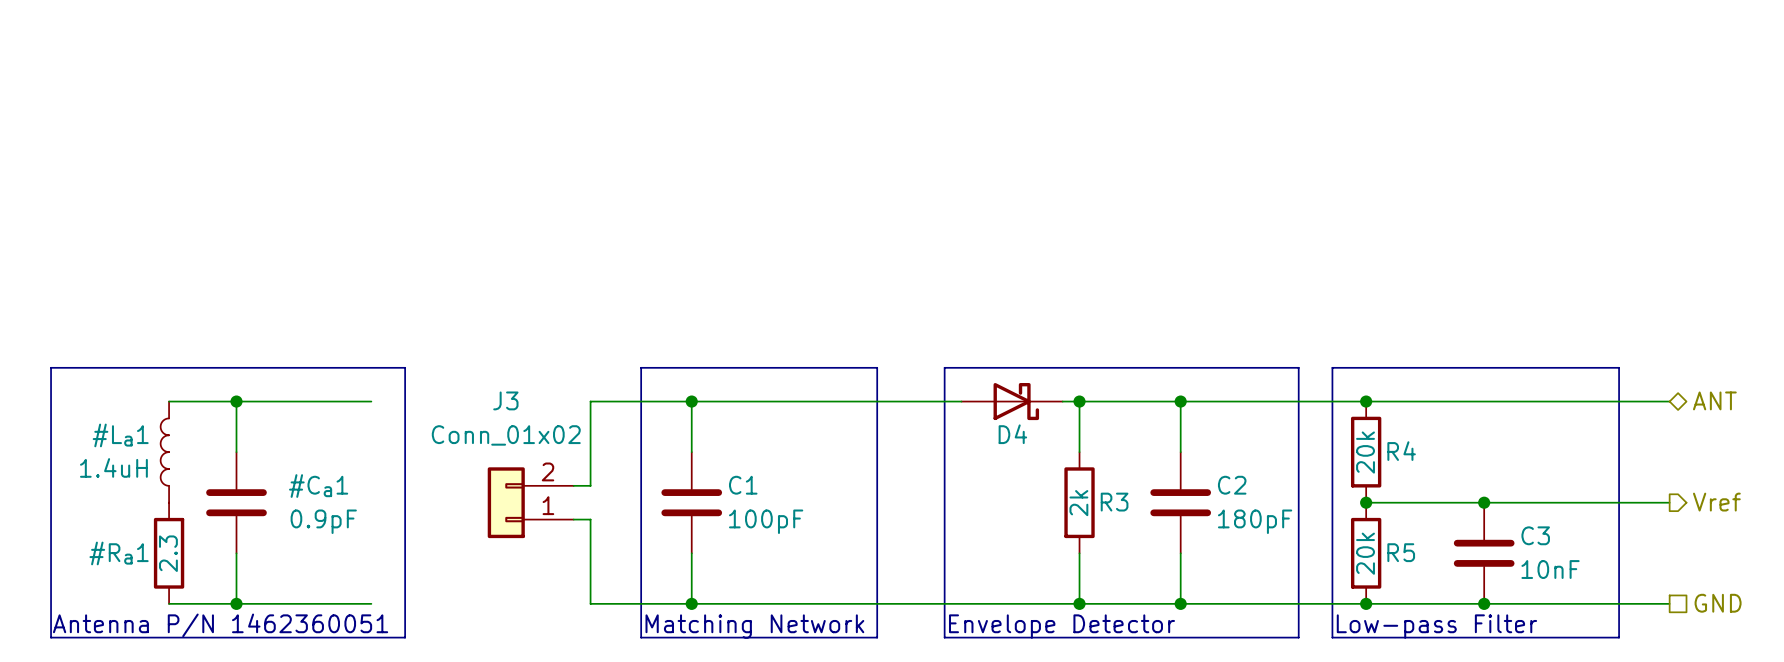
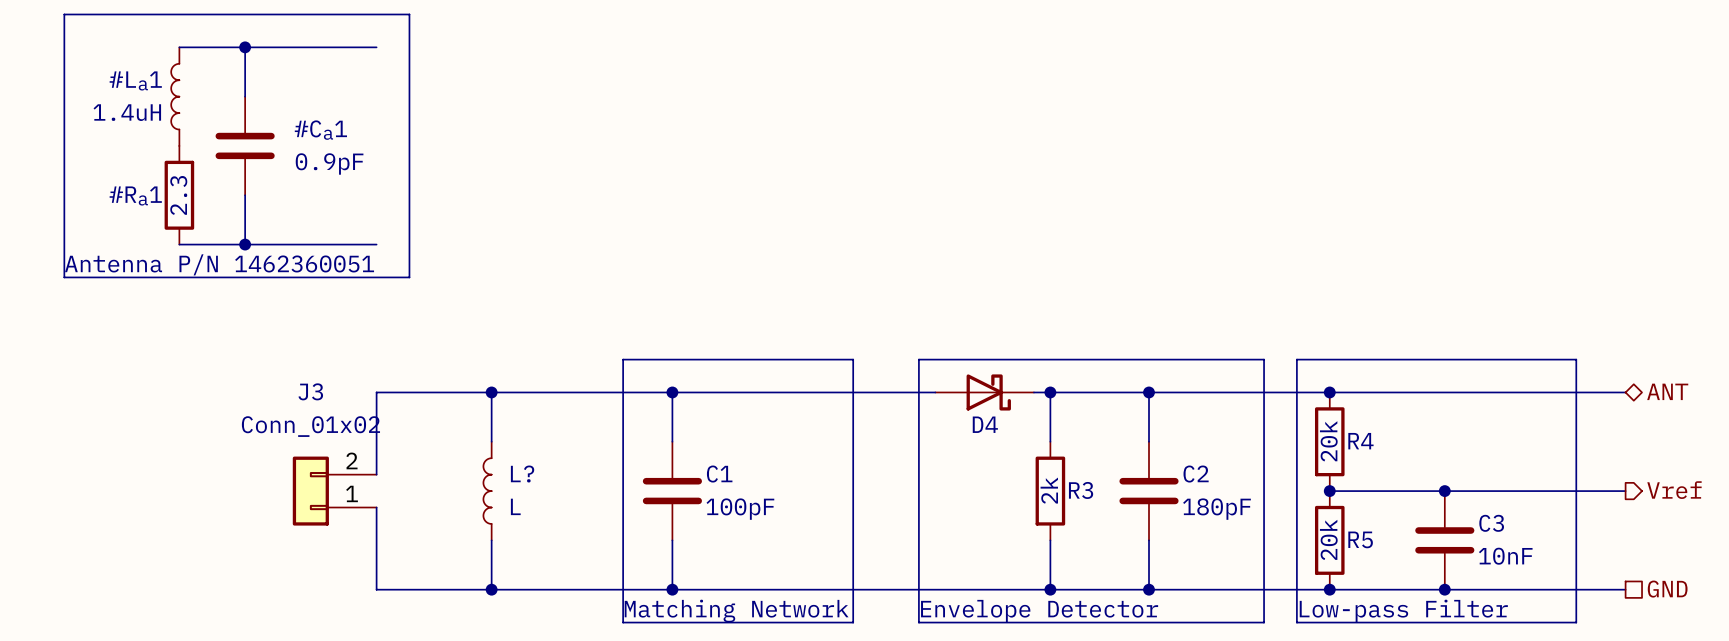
line: none -> (64, 14) (64, 277) (409, 277) (409, 14) (64, 14)
wire: none -> (179, 47) (376, 47)
wire: none -> (245, 47) (245, 96)
junction: none -> (245, 47)
wire: none -> (245, 195) (245, 244)
junction: none -> (245, 244)
text: none -> Antenna P/N 1462360051 (219, 264)
line: (51, 367) (51, 637) (405, 637) (405, 367) (51, 367) -> none
wire: (169, 401) (371, 401) -> (179, 244) (376, 244)
wire: (236, 401) (236, 452) -> (491, 392) (491, 441)
junction: (236, 401) -> none
junction: none -> (491, 392)
wire: (590, 401) (590, 485) (573, 485) -> (573, 392) (376, 392) (376, 474)
#La1 position: 1.4uH (164, 452) -> 1.4uH (175, 96)
#Ca1 position: 0.9pF (236, 502) -> 0.9pF (245, 145)
L?: none -> L (487, 491)
J3 position: (530, 502) -> (334, 491)
wire: (573, 519) (590, 519) (590, 603) -> (376, 507) (376, 589) (573, 589)
#Ra1 position: 2.3 (169, 553) -> 2.3 (179, 195)
wire: (236, 553) (236, 603) -> (491, 540) (491, 589)
wire: (169, 603) (371, 603) -> none
junction: (236, 603) -> none
junction: none -> (491, 589)
text: Antenna P/N 1462360051 (220, 625) -> none

